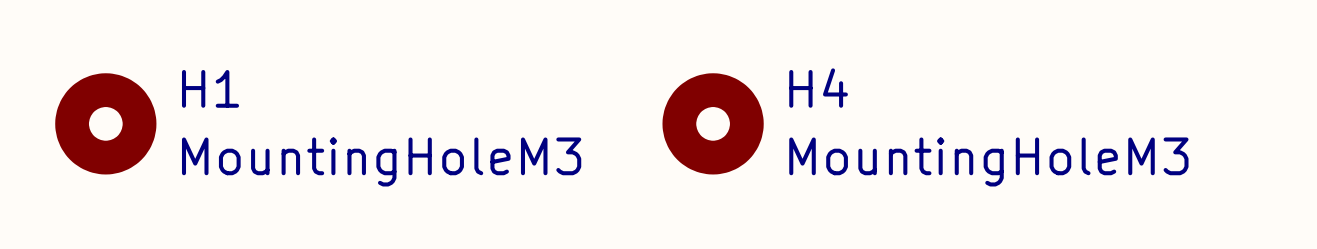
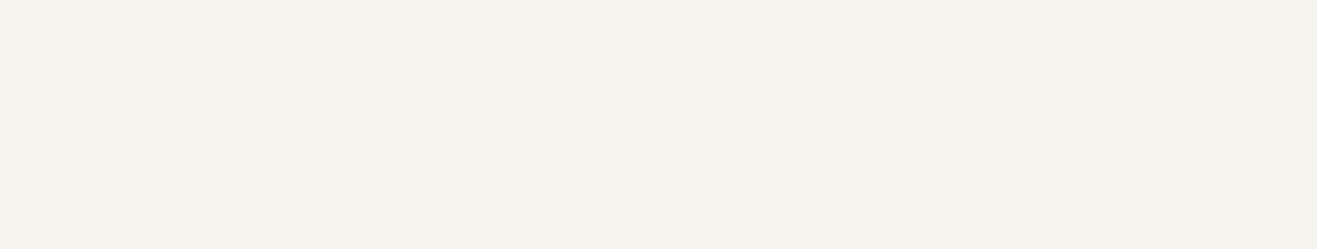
H1: MountingHoleM3 (105, 123) -> none
H4: MountingHoleM3 (713, 123) -> none

